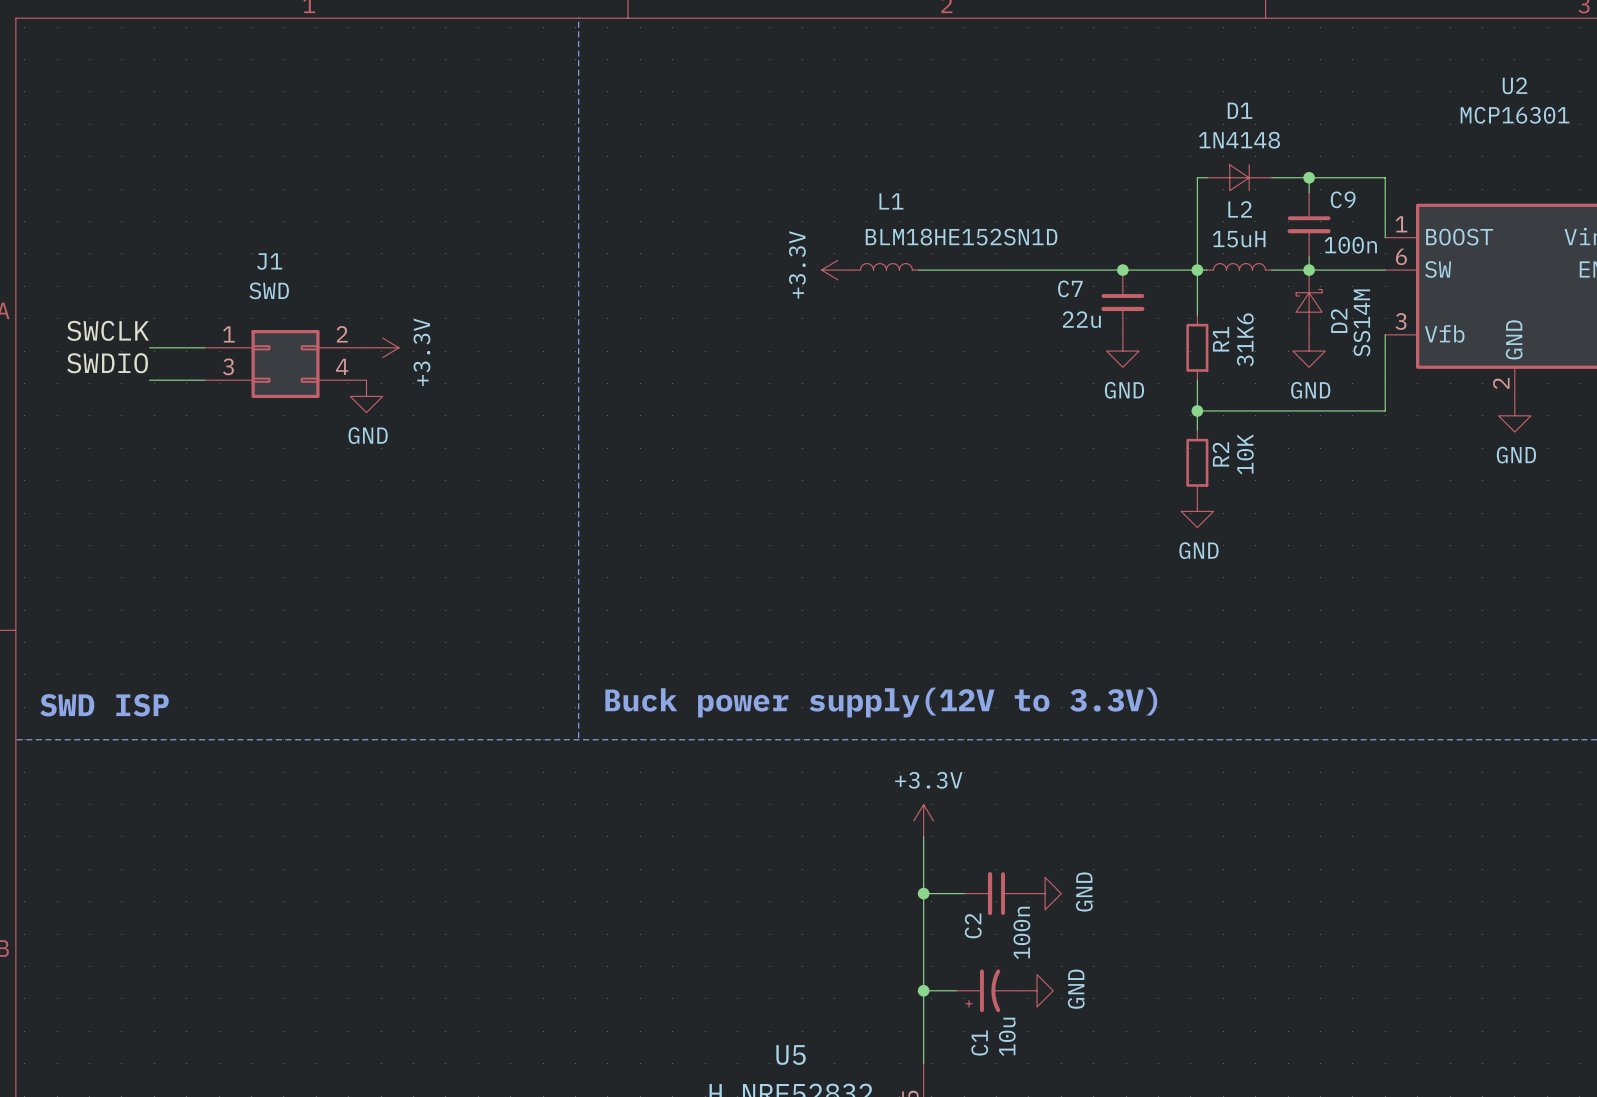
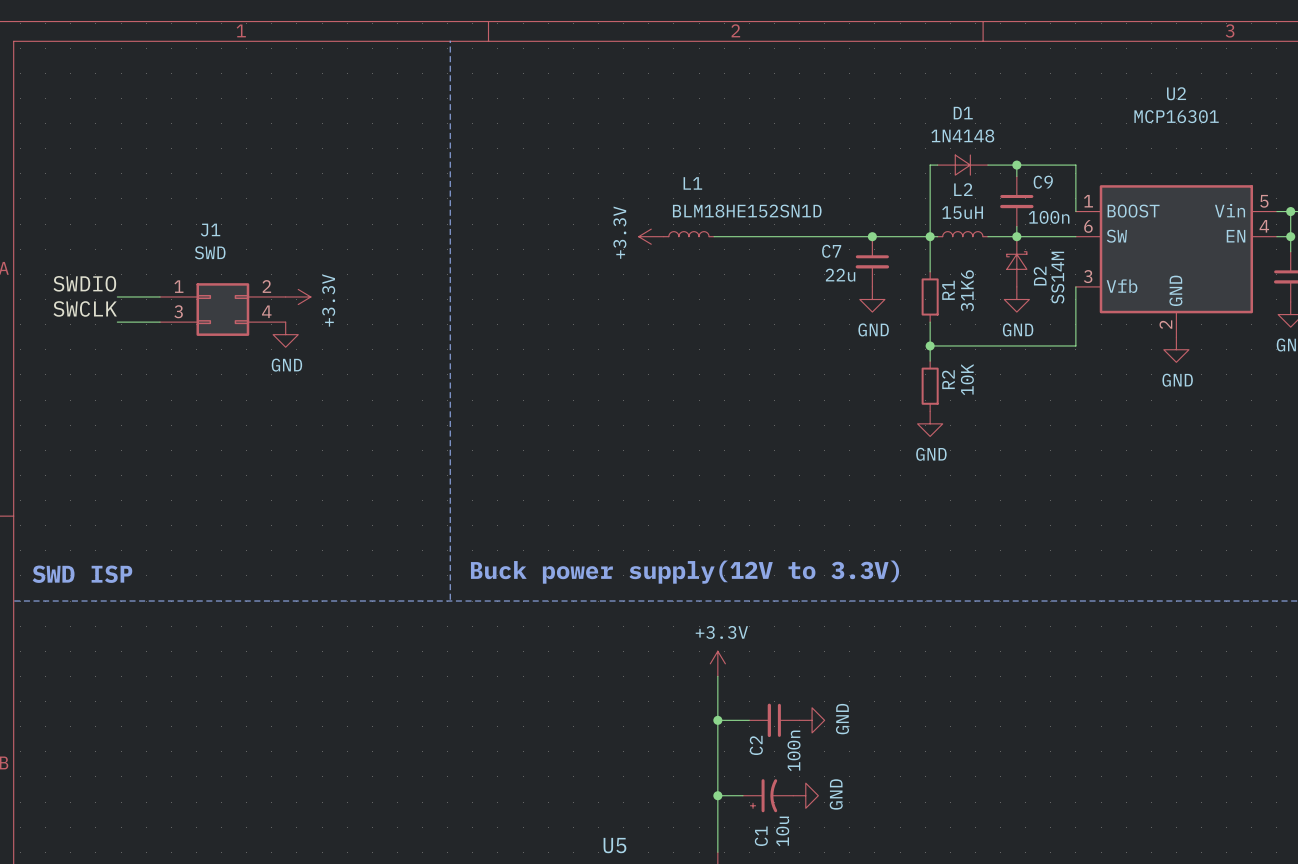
label: SWCLK (108, 330) -> SWDIO (84, 283)
label: SWDIO (107, 363) -> SWCLK (85, 308)

